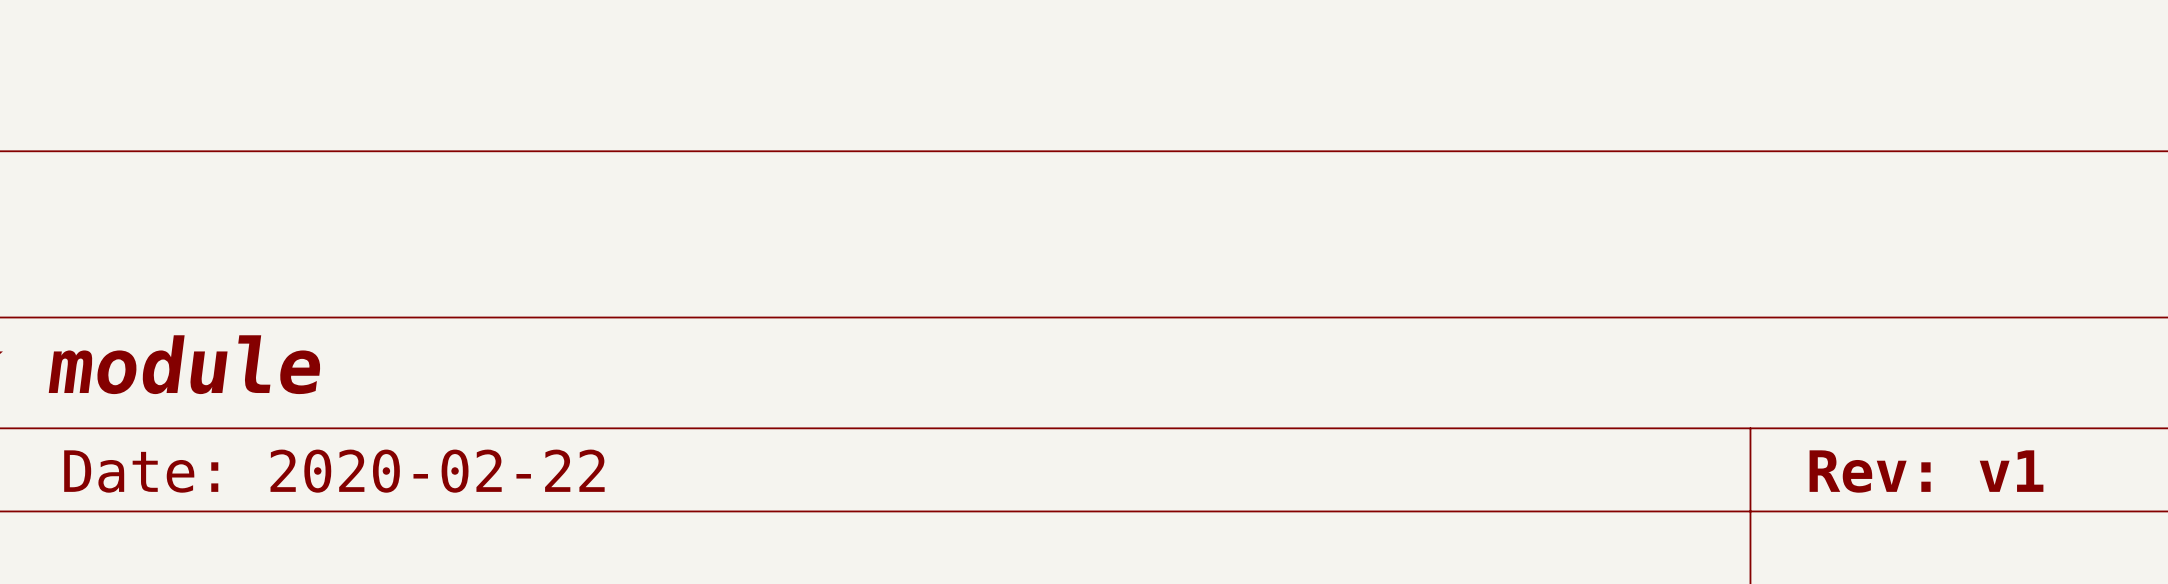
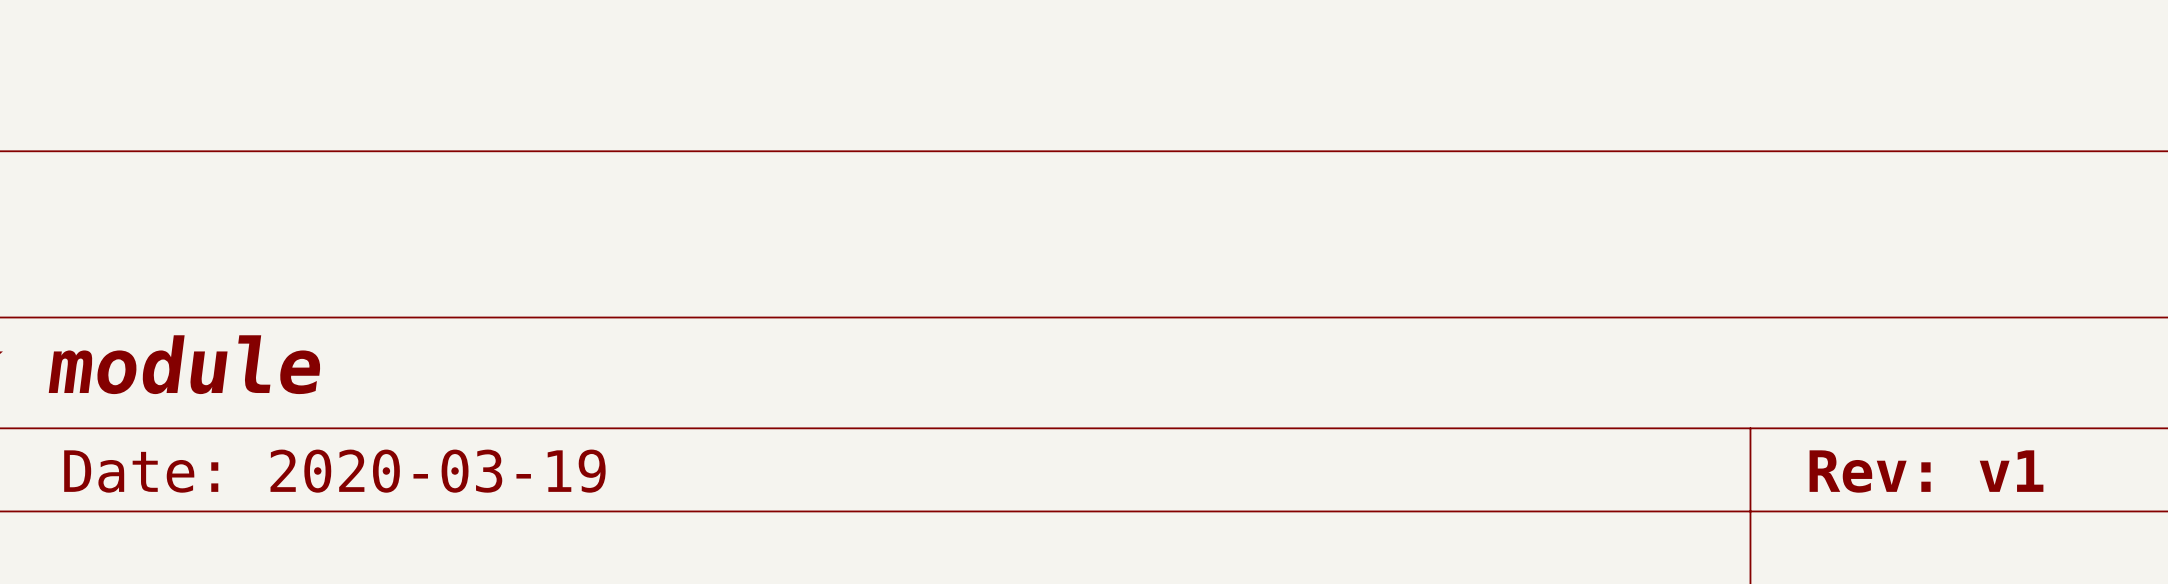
title block: Date: 2020-02-22 (334, 471) -> Date: 2020-03-19 (334, 471)

